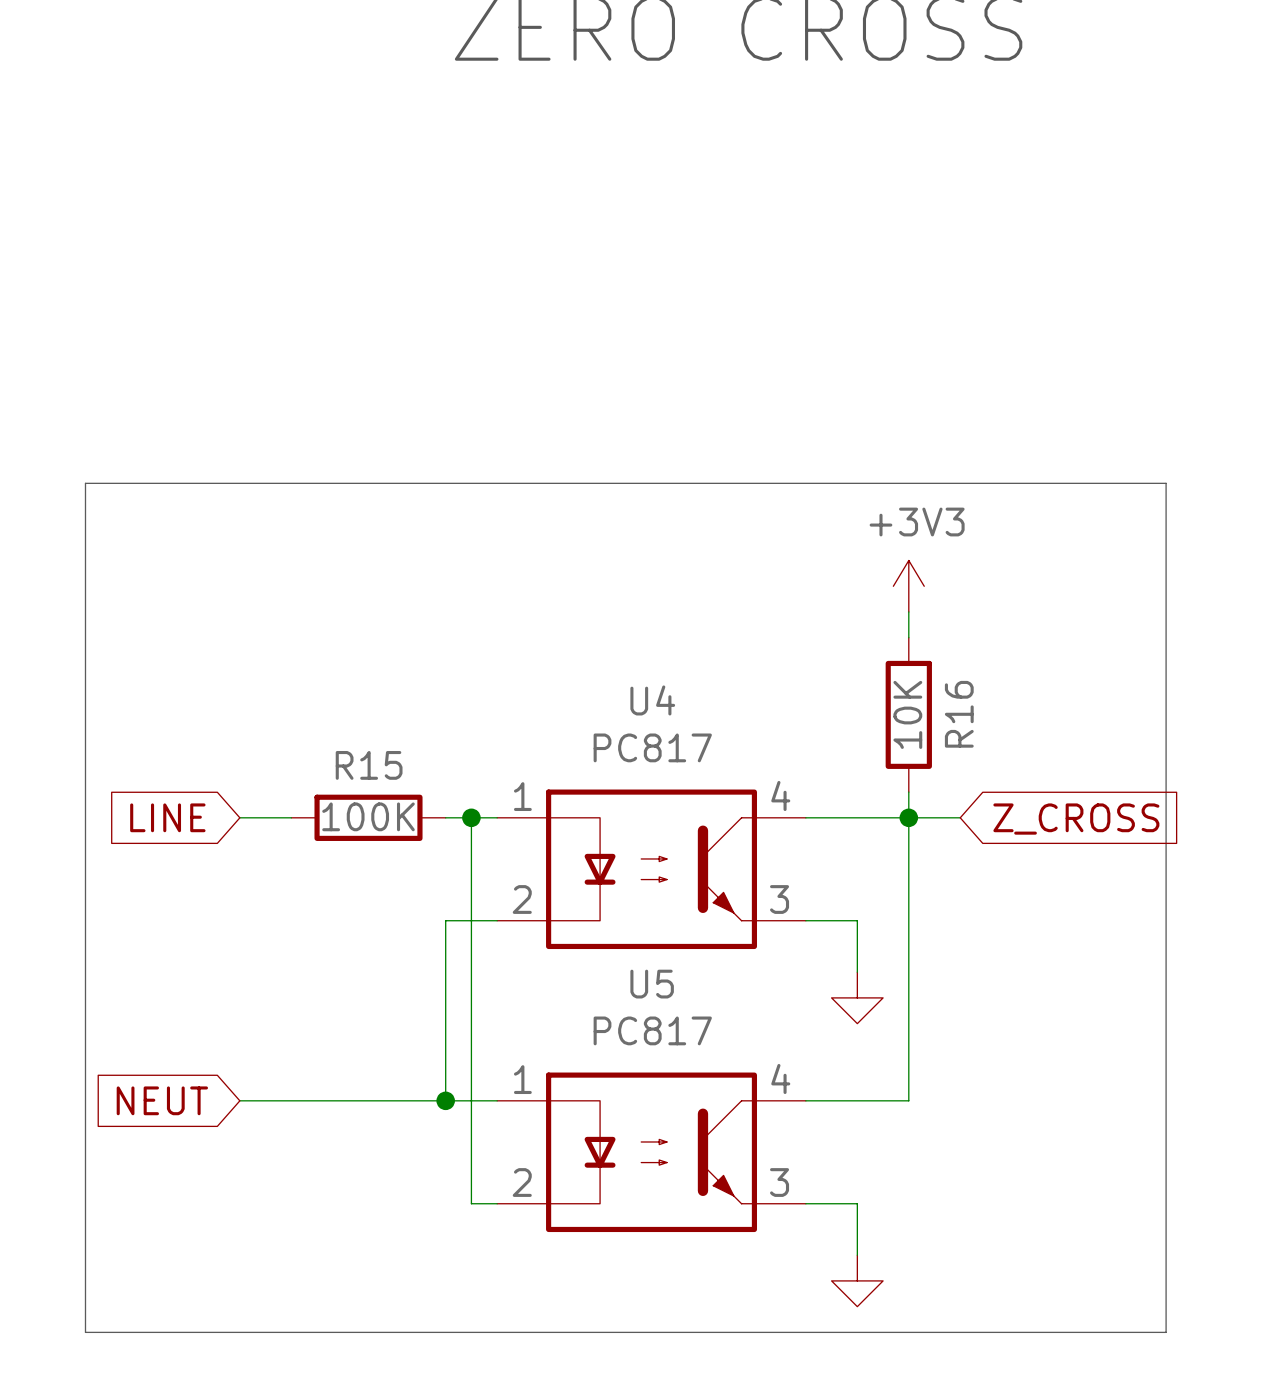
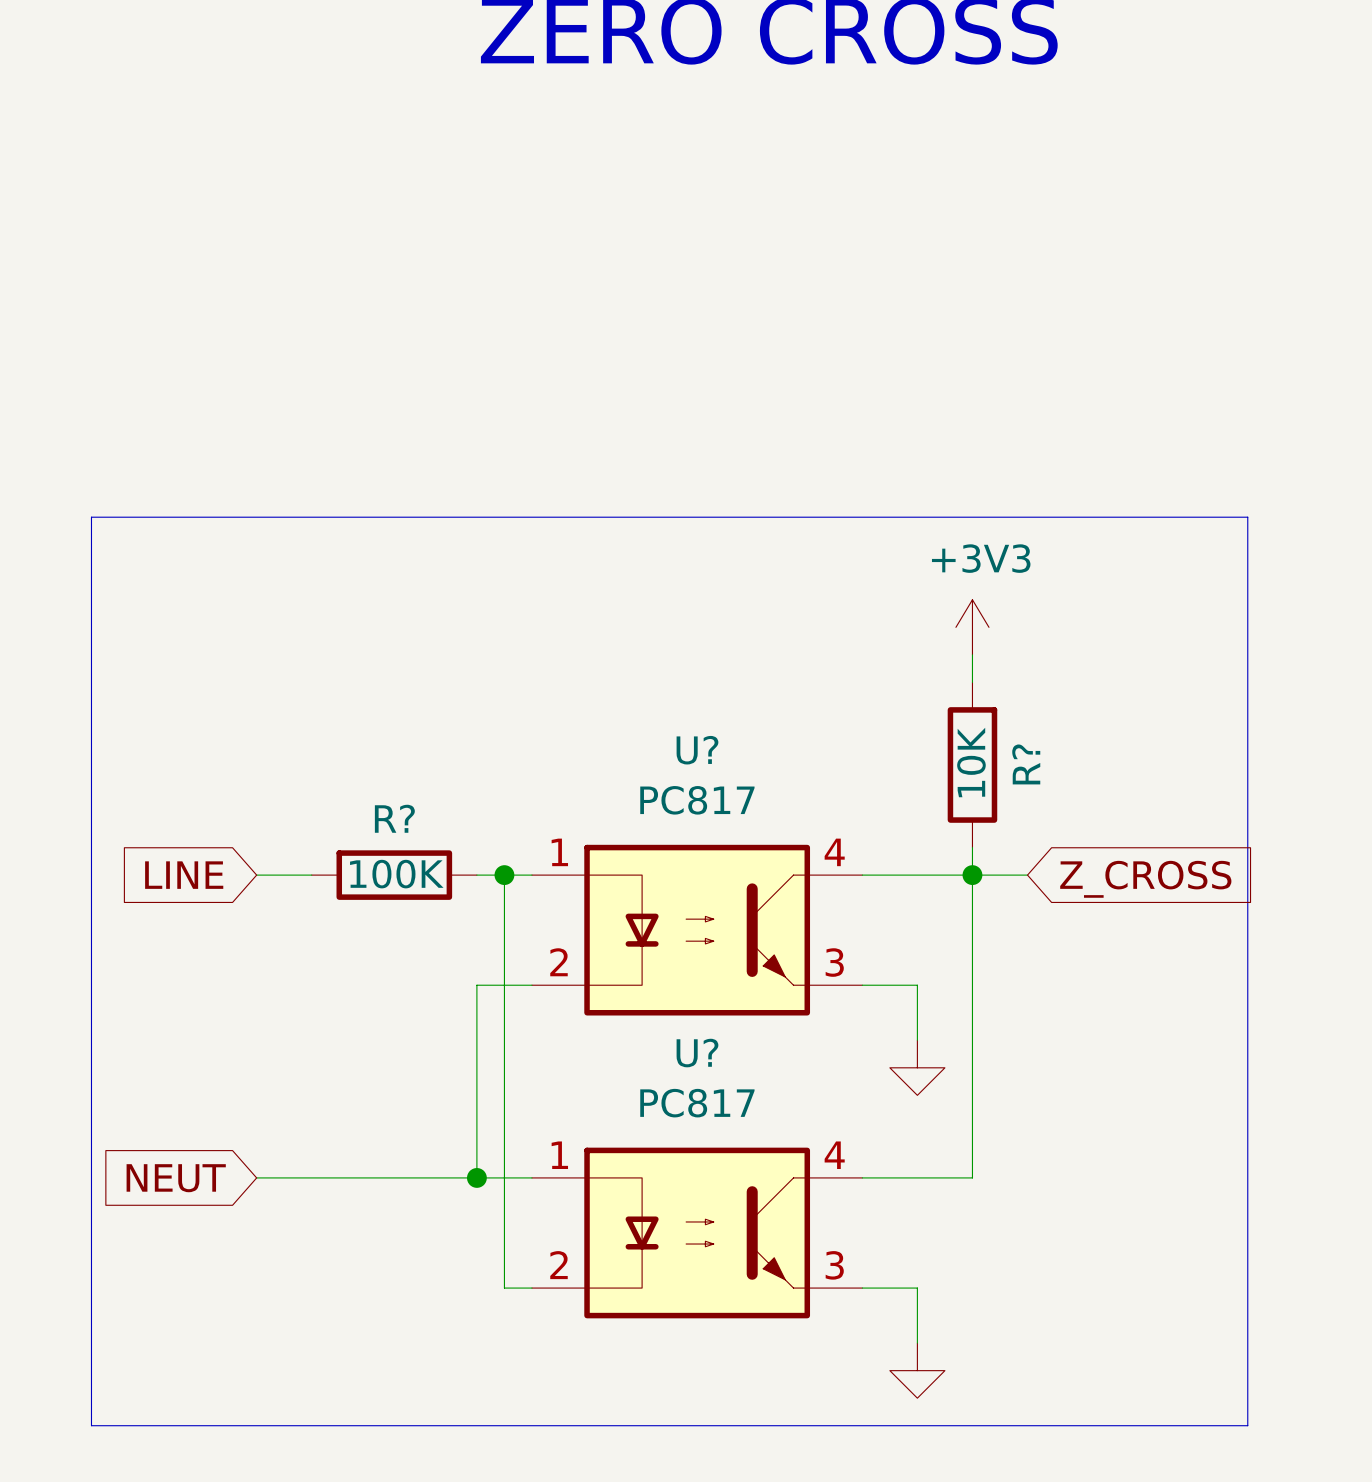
U4 name: U4 (652, 700) -> U? (697, 750)
R16 name: R16 (959, 714) -> R? (1026, 764)
R15 name: R15 (369, 765) -> R? (394, 818)
U5 name: U5 (652, 984) -> U? (697, 1053)

